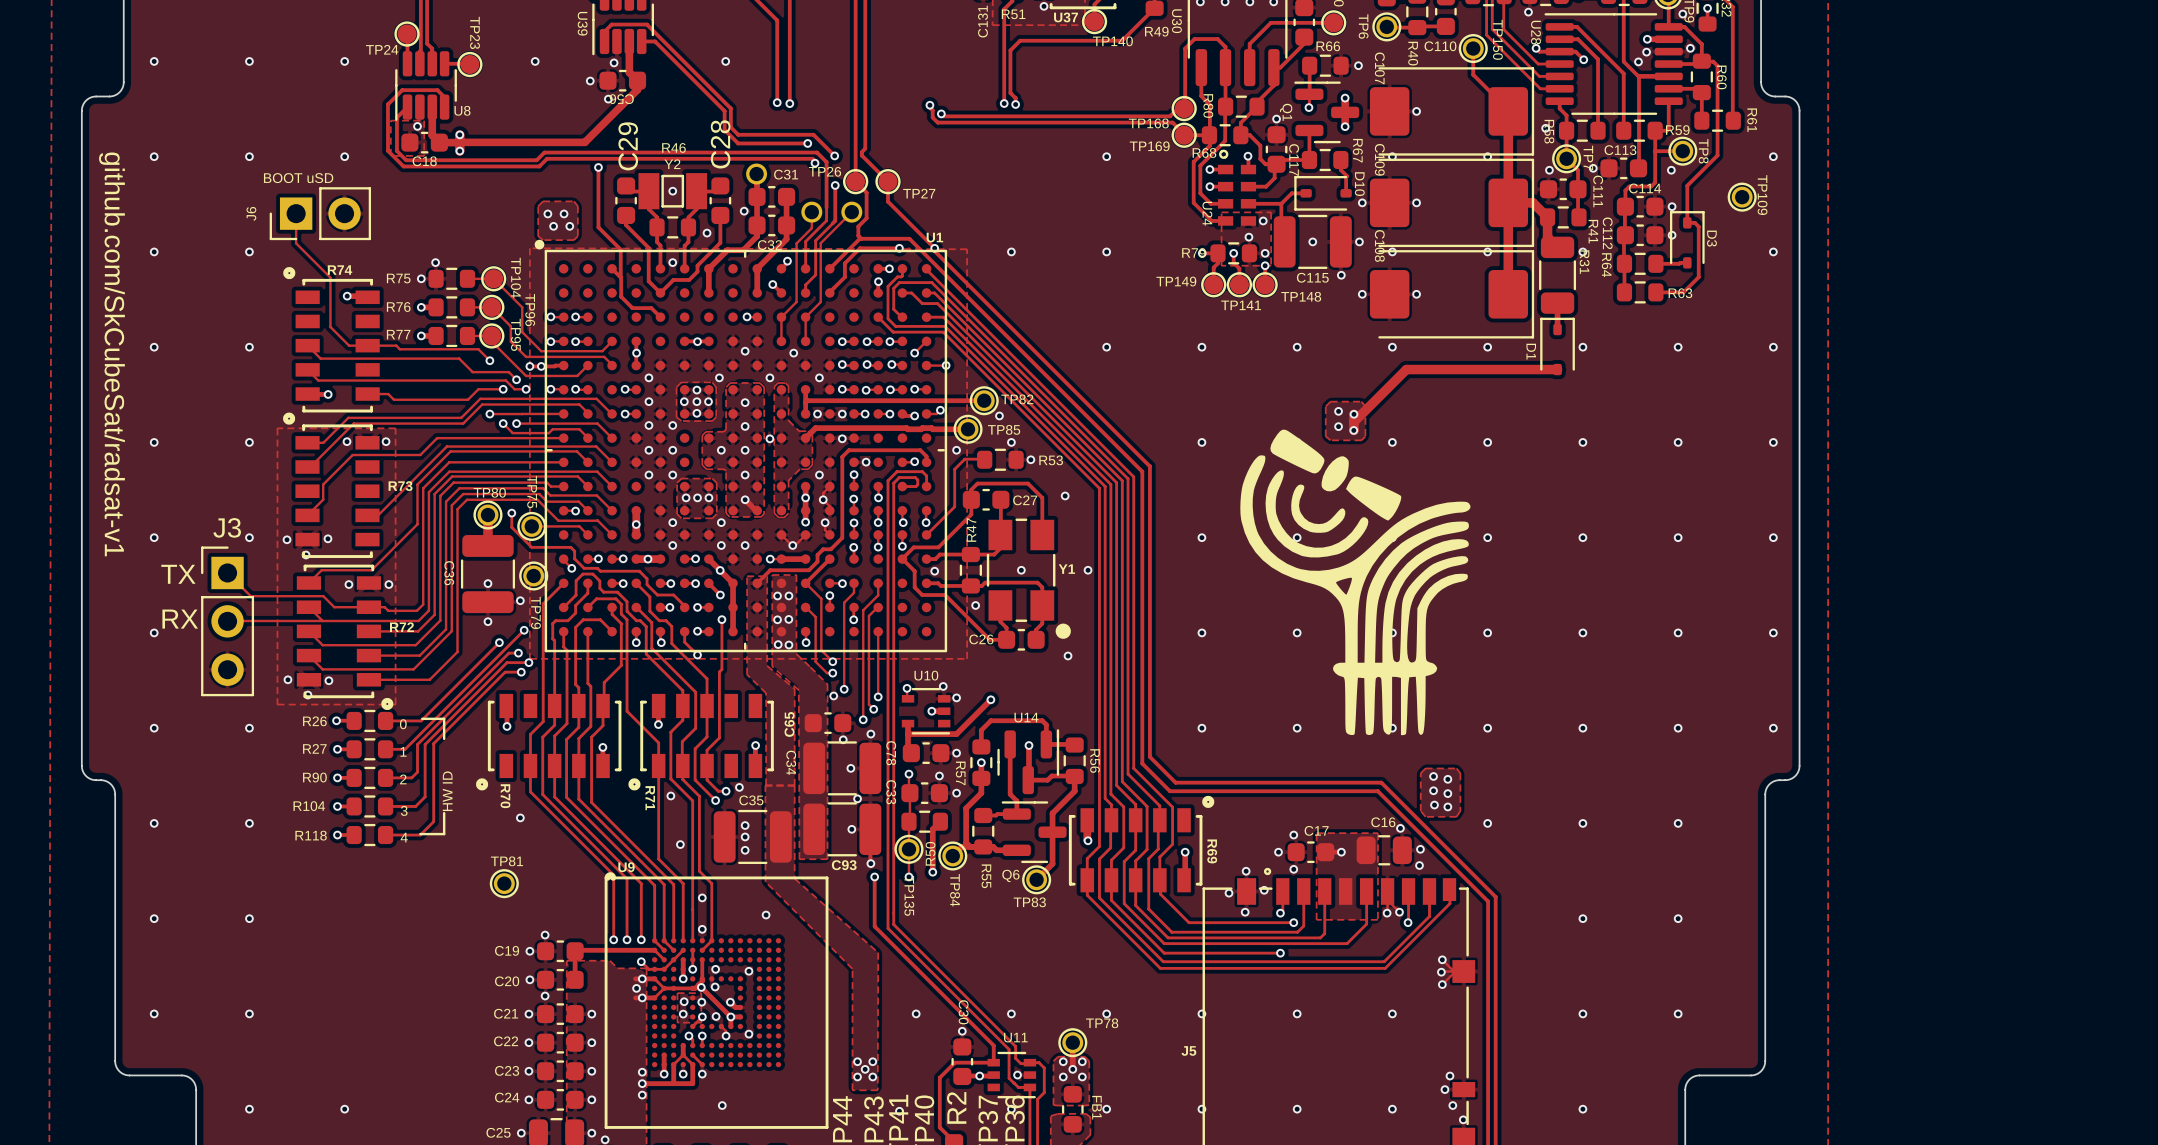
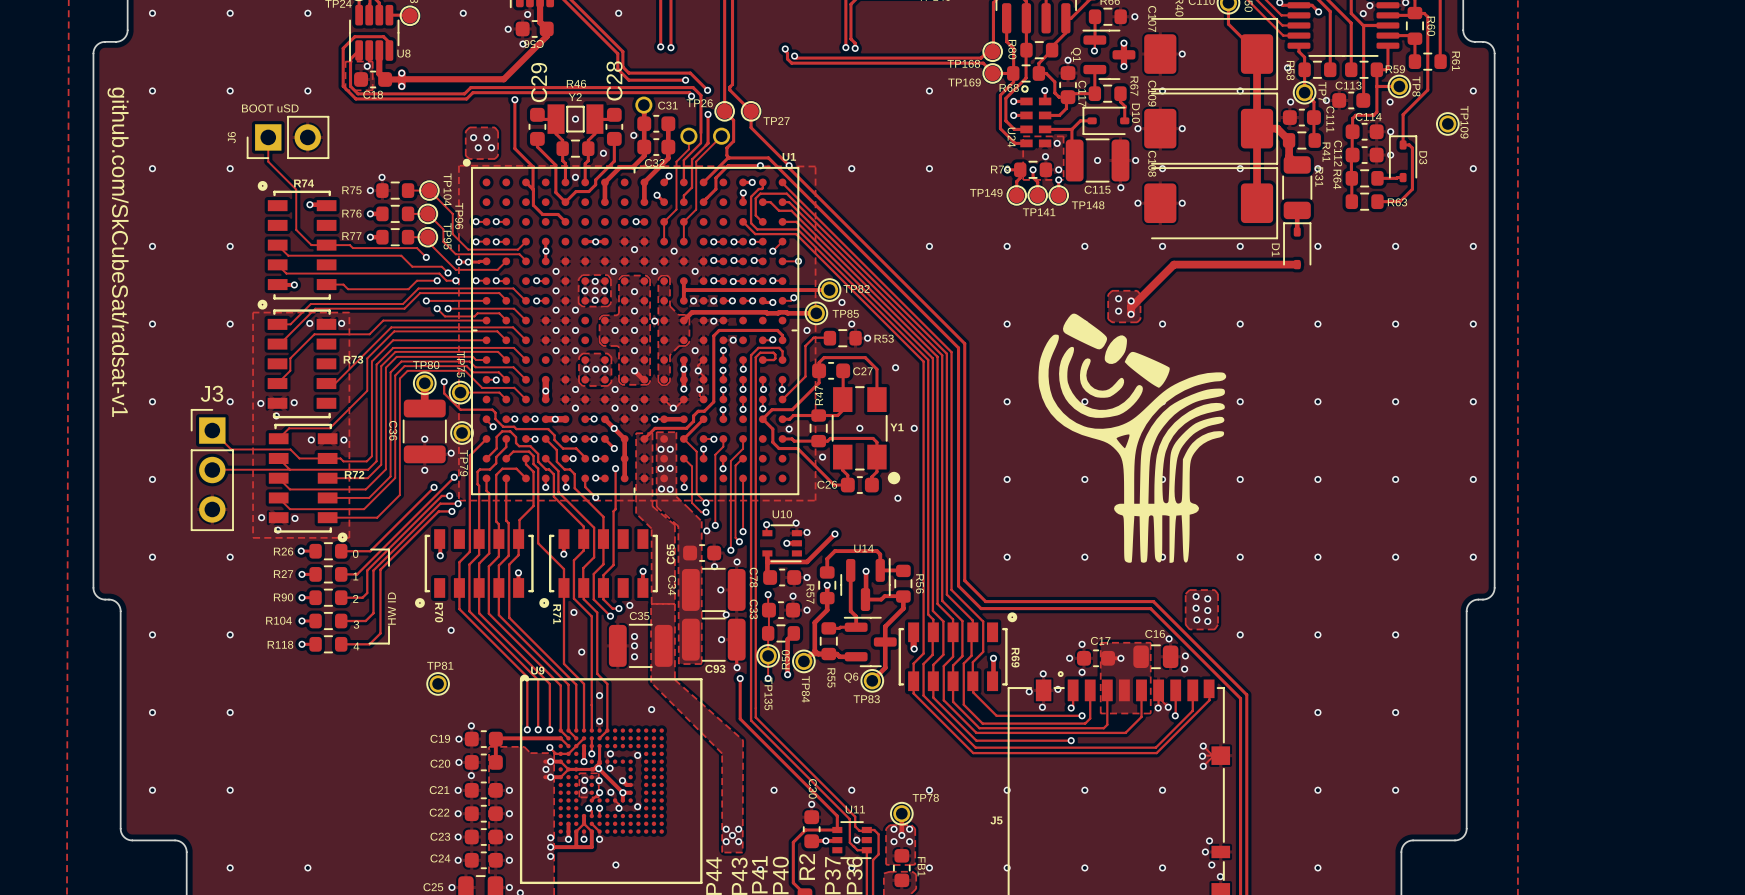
text: TX (178, 574) -> none
text: RX (180, 619) -> none

